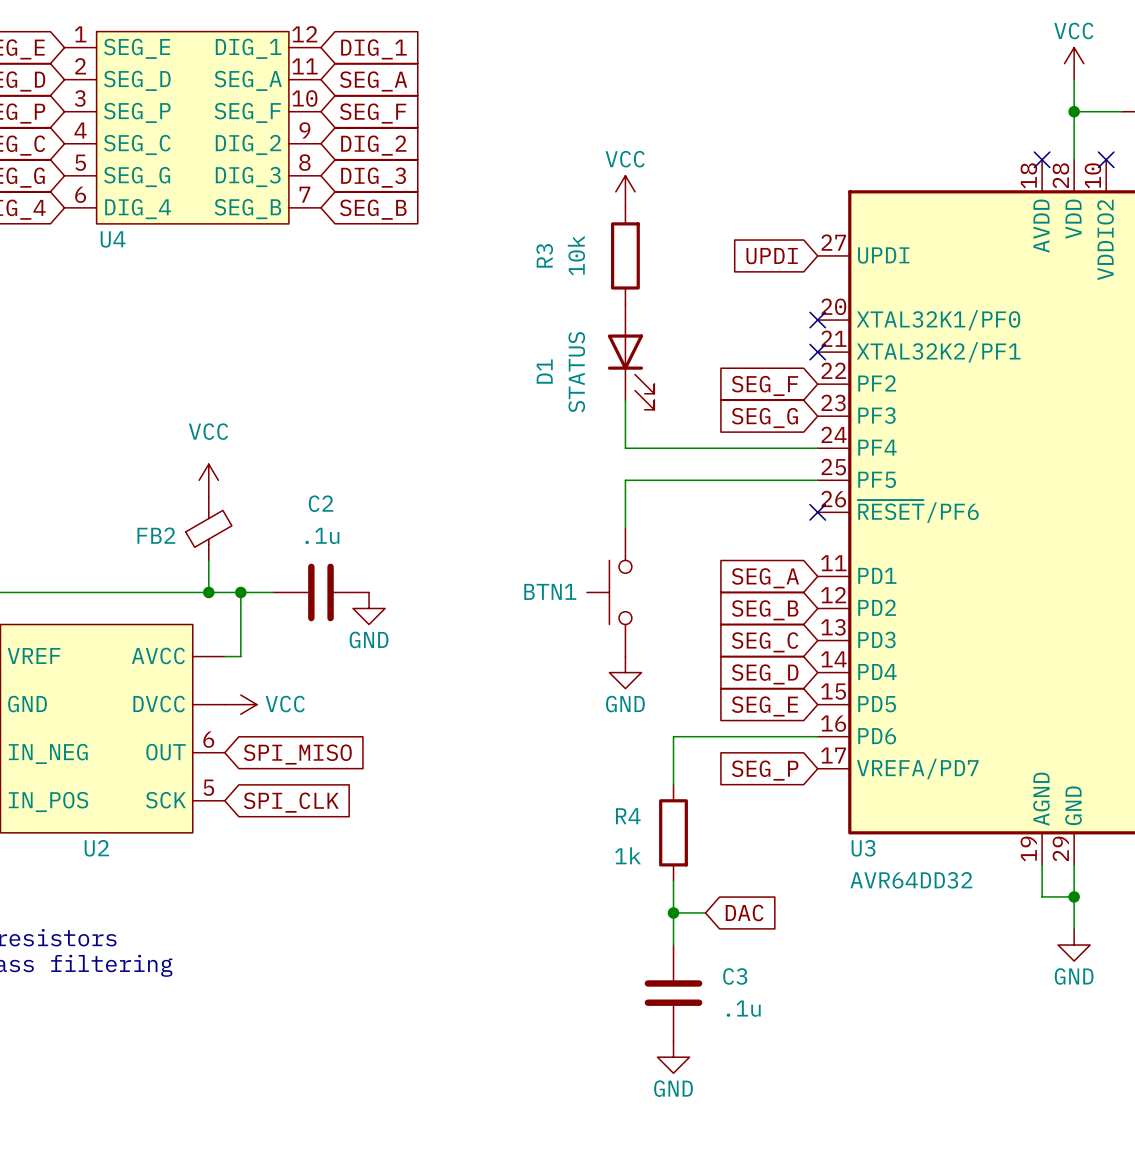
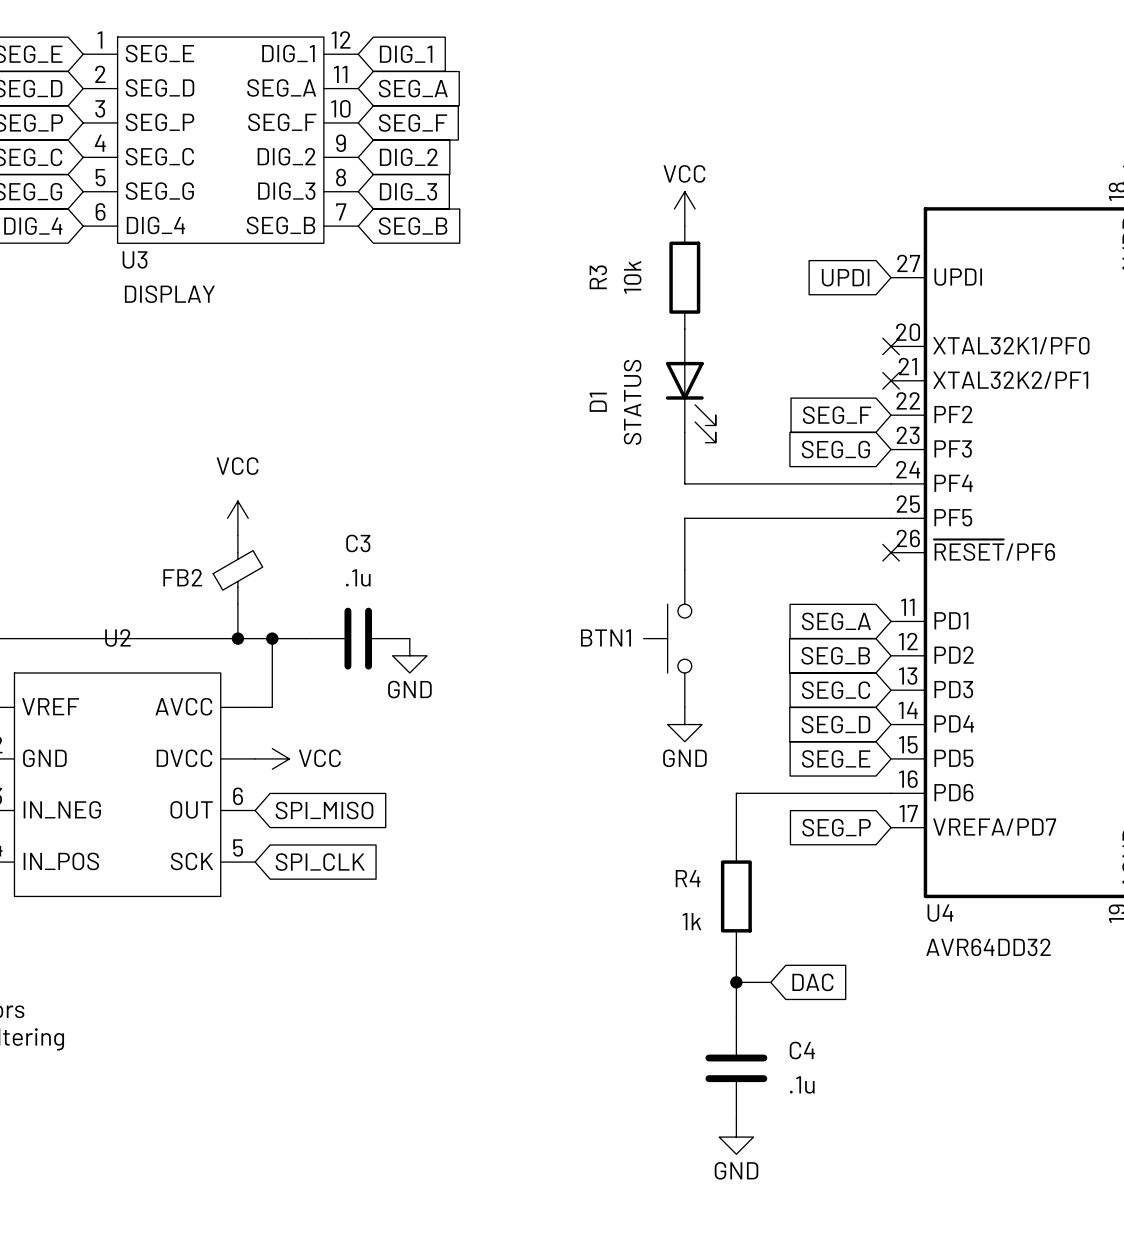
U4 name: U4 (113, 239) -> U3 (135, 259)
U4 value: none -> DISPLAY (169, 294)
C2 name: C2 (321, 503) -> C3 (358, 543)
U2 name position: U2 (96, 848) -> U2 (117, 637)
U3 name: U3 (863, 848) -> U4 (940, 913)
C3 name: C3 (735, 976) -> C4 (802, 1050)

